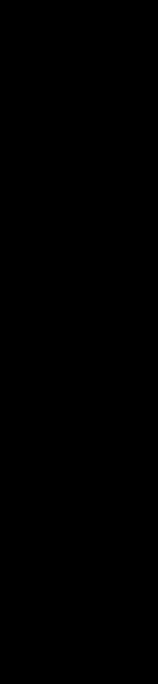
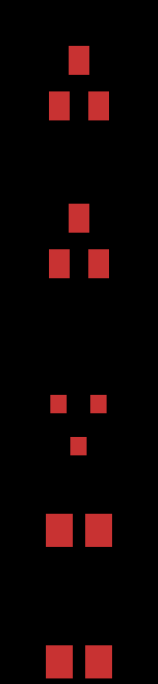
part: none -> (78, 83)
part: none -> (78, 240)
part: none -> (78, 425)
part: none -> (78, 530)
part: none -> (78, 661)

